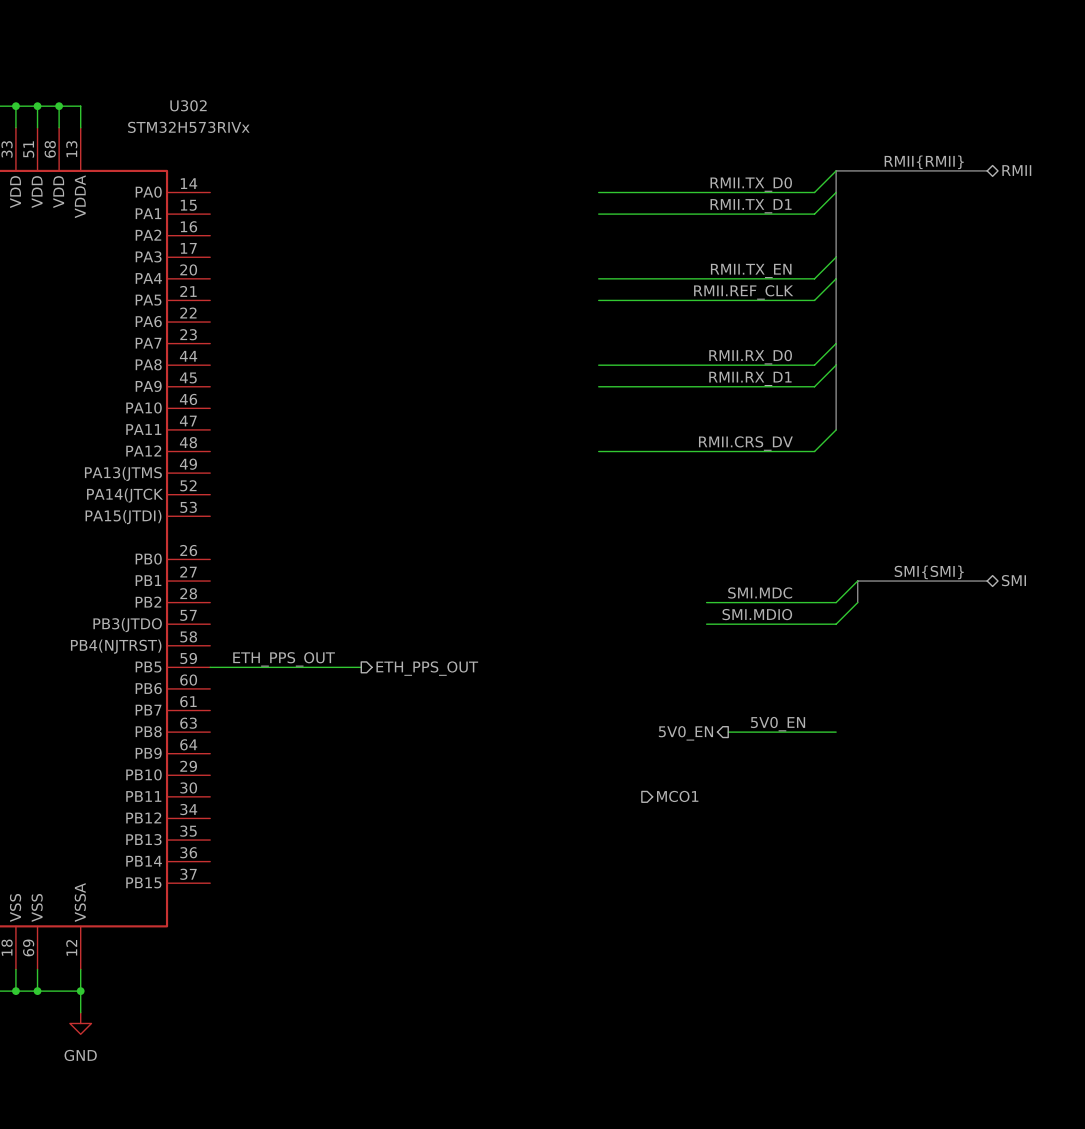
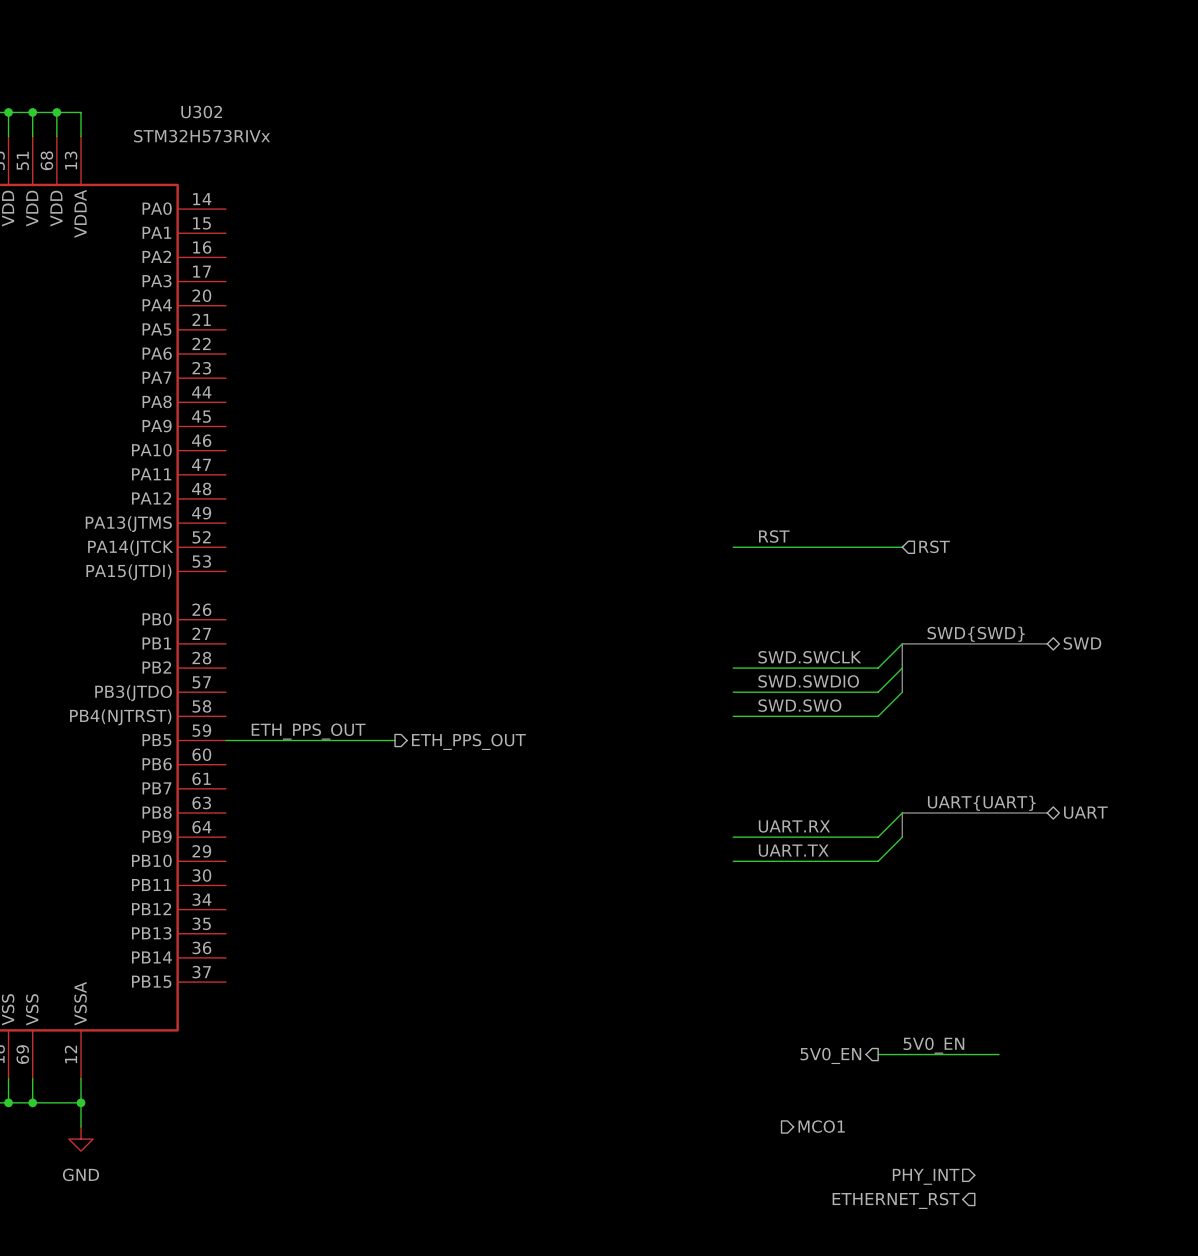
label: RMII{RMII} (924, 162) -> none
wire: (836, 170) (814, 192) (598, 192) -> none
bus: (987, 170) (836, 170) (836, 429) -> none
hierarchical label: RMII (1016, 170) -> none
label: RMII.TX_D0 (751, 184) -> none
wire: (836, 192) (814, 214) (598, 214) -> none
label: RMII.TX_D1 (751, 206) -> none
wire: (836, 257) (814, 278) (598, 278) -> none
label: RMII.TX_EN (751, 270) -> none
wire: (836, 278) (814, 300) (598, 300) -> none
label: RMII.REF_CLK (743, 292) -> none
wire: (836, 343) (814, 365) (598, 365) -> none
label: RMII.RX_D0 (750, 357) -> none
wire: (836, 365) (814, 386) (598, 386) -> none
label: RMII.RX_D1 (750, 378) -> none
wire: (836, 429) (814, 451) (598, 451) -> none
label: RMII.CRS_DV (745, 443) -> none
label: none -> RST (774, 536)
wire: none -> (733, 547) (902, 547)
hierarchical label: none -> RST (934, 546)
label: none -> SWD{SWD} (976, 634)
label: SMI{SMI} (929, 572) -> none
hierarchical label: none -> SWD (1082, 643)
hierarchical label: SMI (1013, 580) -> none
wire: (857, 581) (836, 602) (792, 602) -> (902, 643) (878, 668)
bus: (857, 581) (857, 602) -> (950, 643) (902, 643) (902, 692)
bus: (944, 581) (987, 581) -> none
label: none -> SWD.SWCLK (809, 657)
label: SMI.MDC (760, 592) -> none
wire: none -> (733, 668) (781, 668)
wire: (857, 602) (836, 624) (792, 624) -> (902, 668) (878, 692)
label: none -> SWD.SWDIO (808, 681)
label: SMI.MDIO (757, 614) -> none
wire: none -> (733, 692) (781, 692)
wire: none -> (902, 692) (878, 716) (733, 716)
label: none -> SWD.SWO (799, 705)
label: none -> UART{UART} (981, 803)
label: 5V0_EN (778, 724) -> none
hierarchical label: none -> UART (1085, 812)
wire: (728, 732) (836, 732) -> none
wire: none -> (902, 812) (878, 837) (733, 837)
bus: none -> (1047, 812) (902, 812) (902, 837)
hierarchical label: 5V0_EN (685, 733) -> none
label: none -> UART.RX (794, 826)
wire: none -> (902, 837) (878, 861) (733, 861)
label: none -> UART.TX (793, 850)
hierarchical label: MCO1 (677, 796) -> none
label: none -> 5V0_EN (933, 1045)
wire: none -> (878, 1054) (998, 1054)
hierarchical label: none -> 5V0_EN (830, 1055)
hierarchical label: none -> MCO1 (821, 1126)
hierarchical label: none -> PHY_INT (926, 1176)
hierarchical label: none -> ETHERNET_RST (896, 1200)

